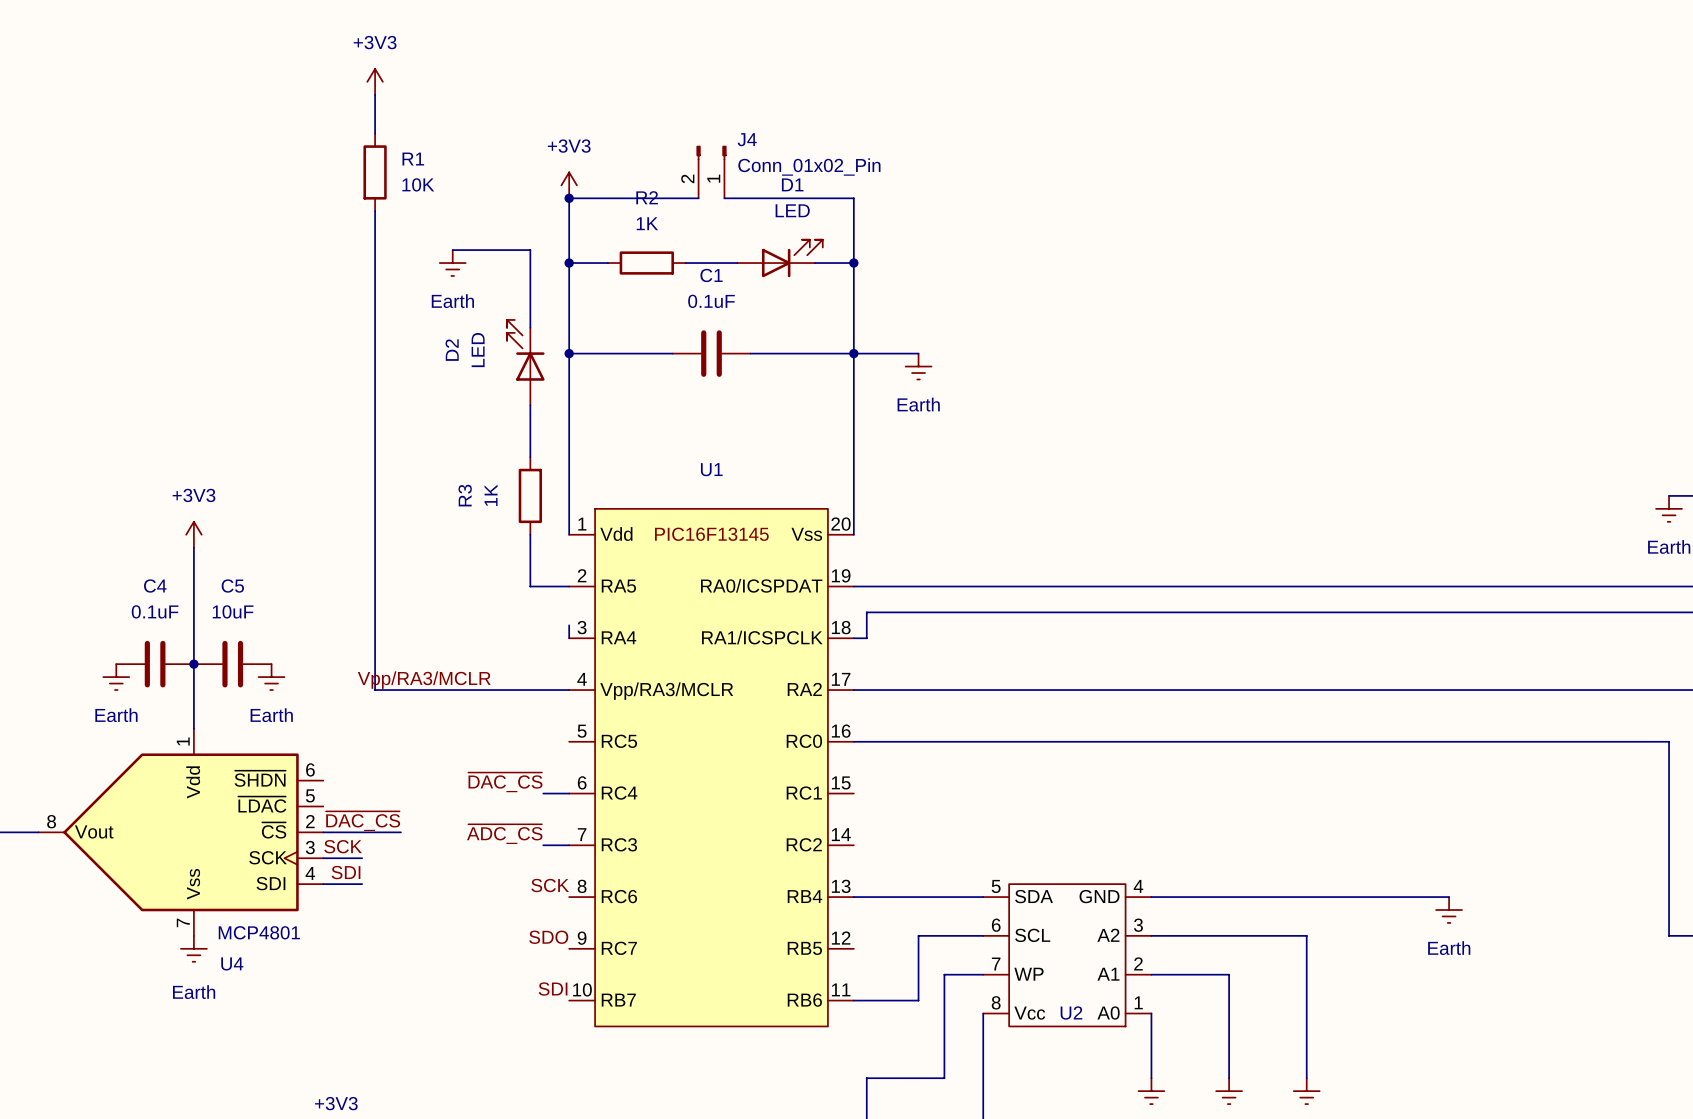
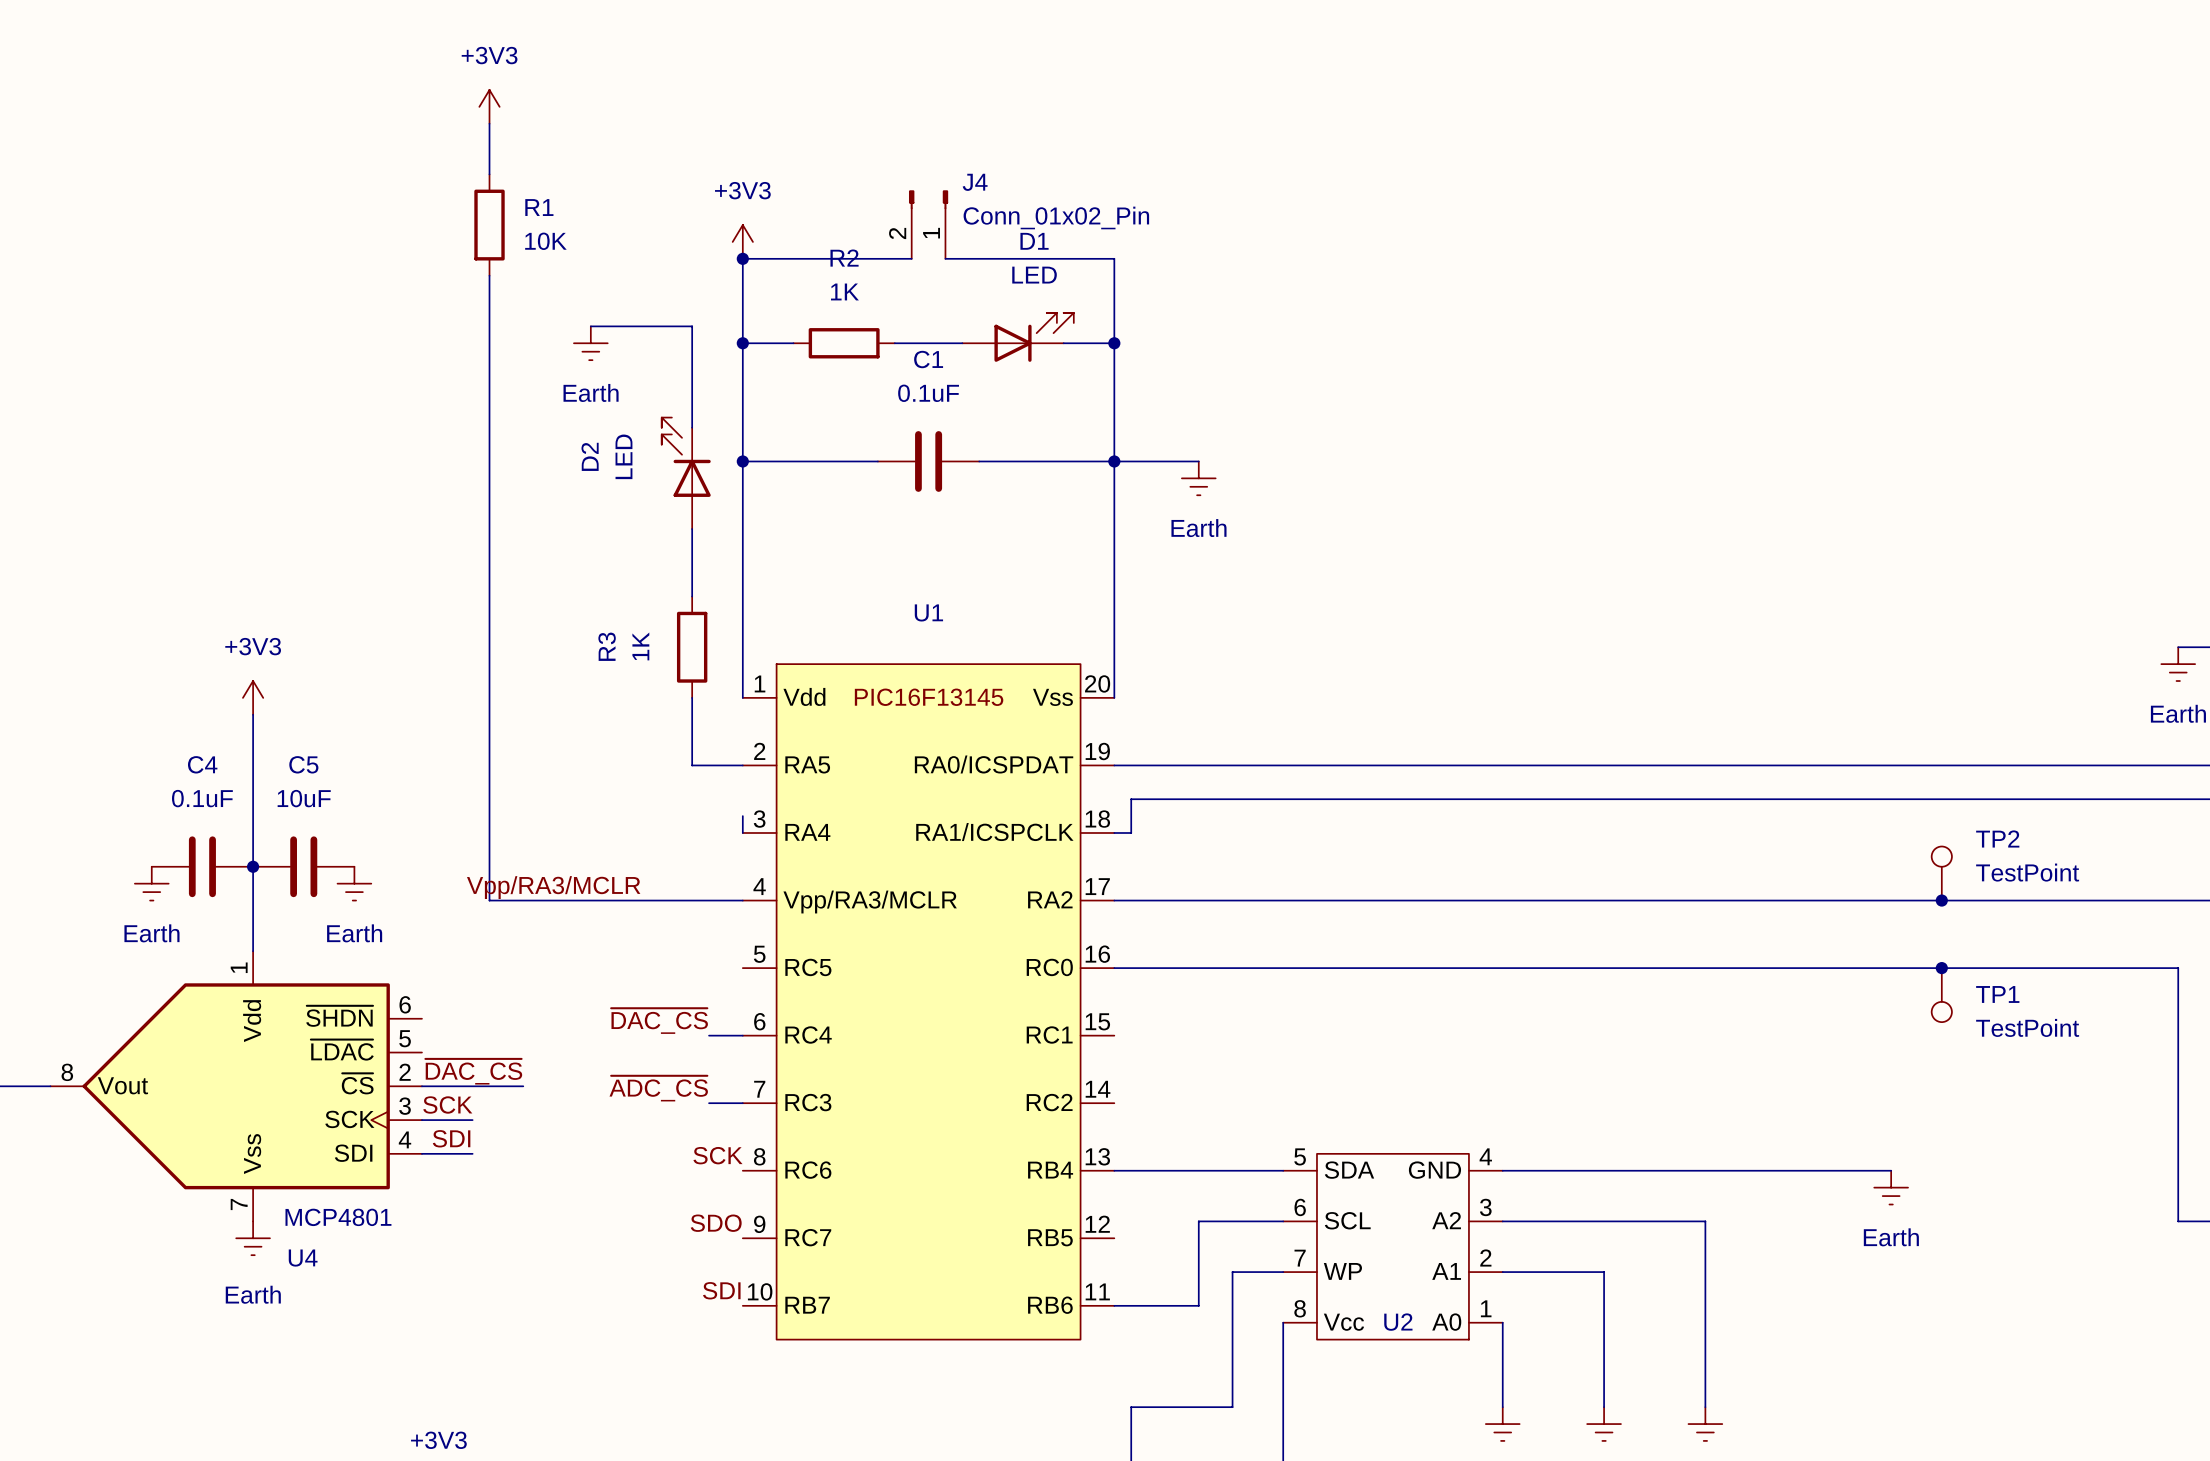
TP2: none -> TestPoint (1941, 873)
junction: none -> (1941, 900)
junction: none -> (1941, 968)
TP1: none -> TestPoint (1941, 995)

